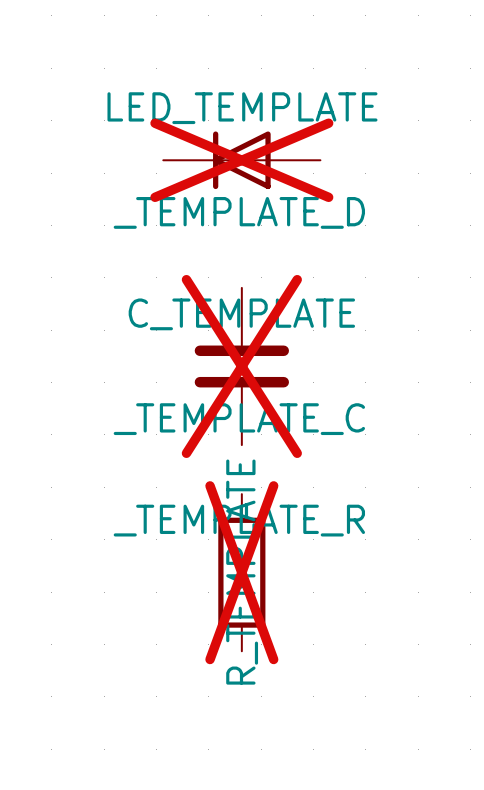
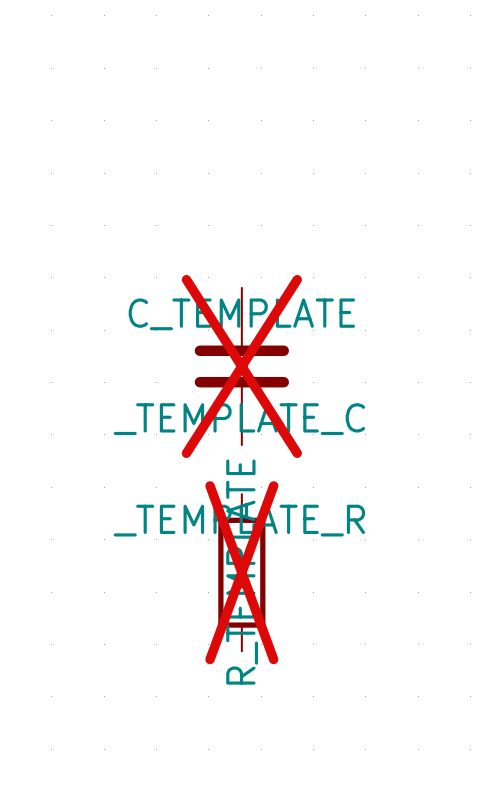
_TEMPLATE_D: LED_TEMPLATE (241, 160) -> none

